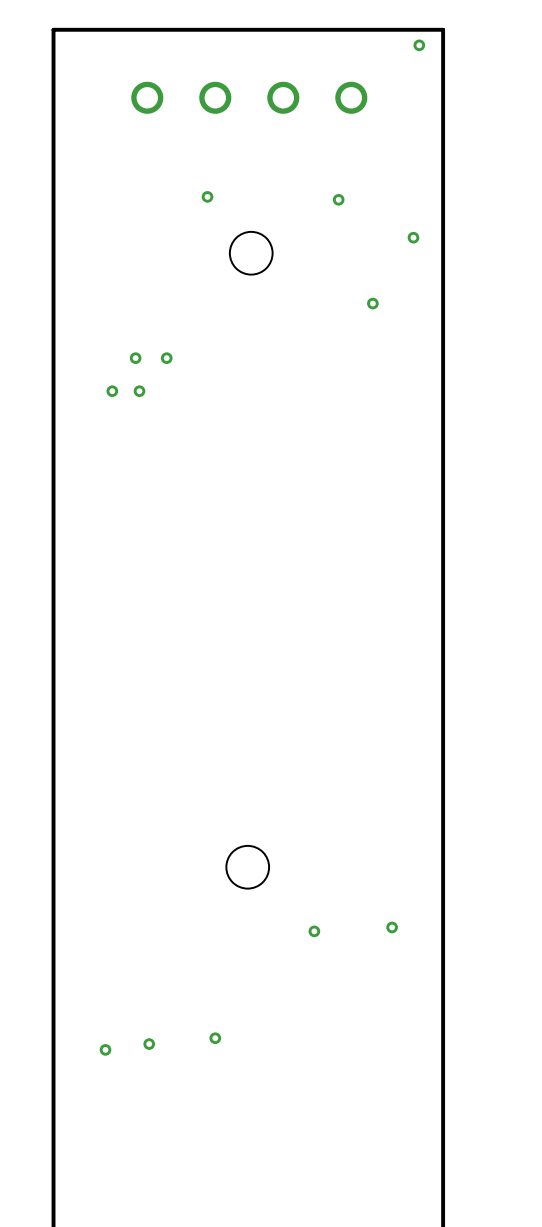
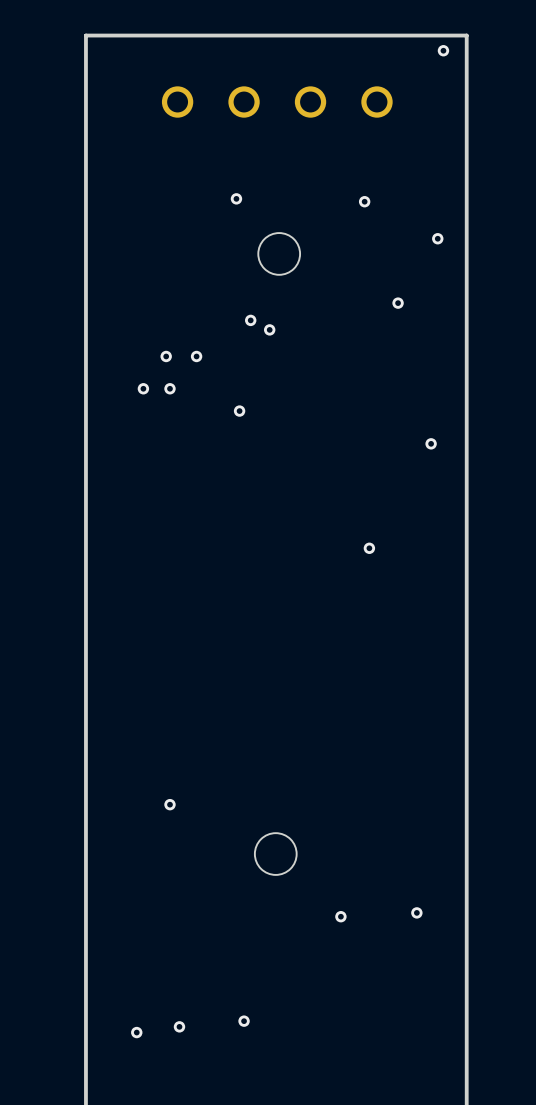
via: none -> (250, 320)
via: none -> (269, 329)
via: none -> (239, 411)
via: none -> (431, 443)
via: none -> (369, 548)
via: none -> (169, 804)

